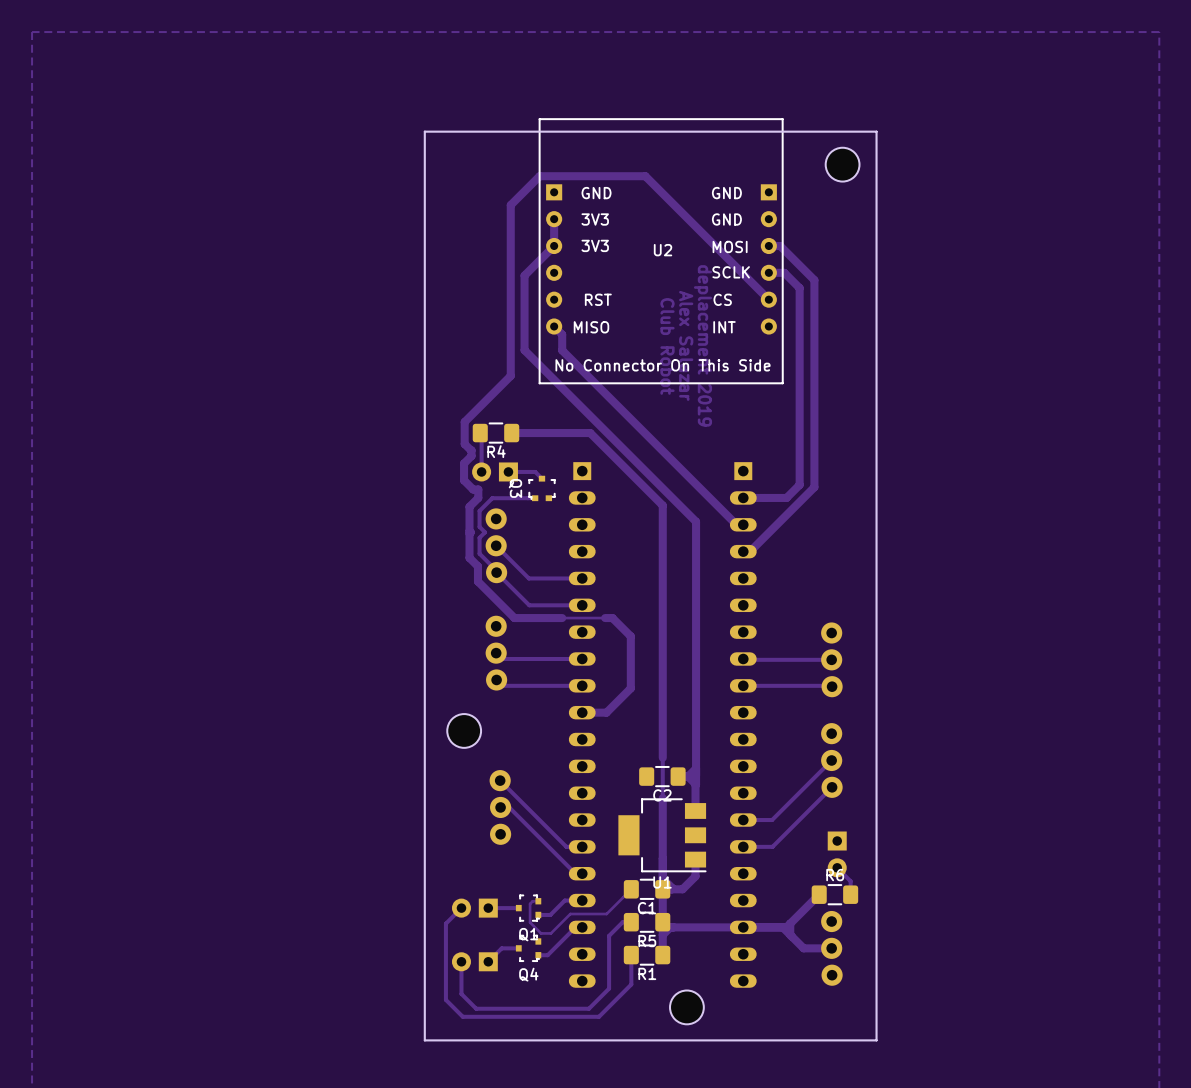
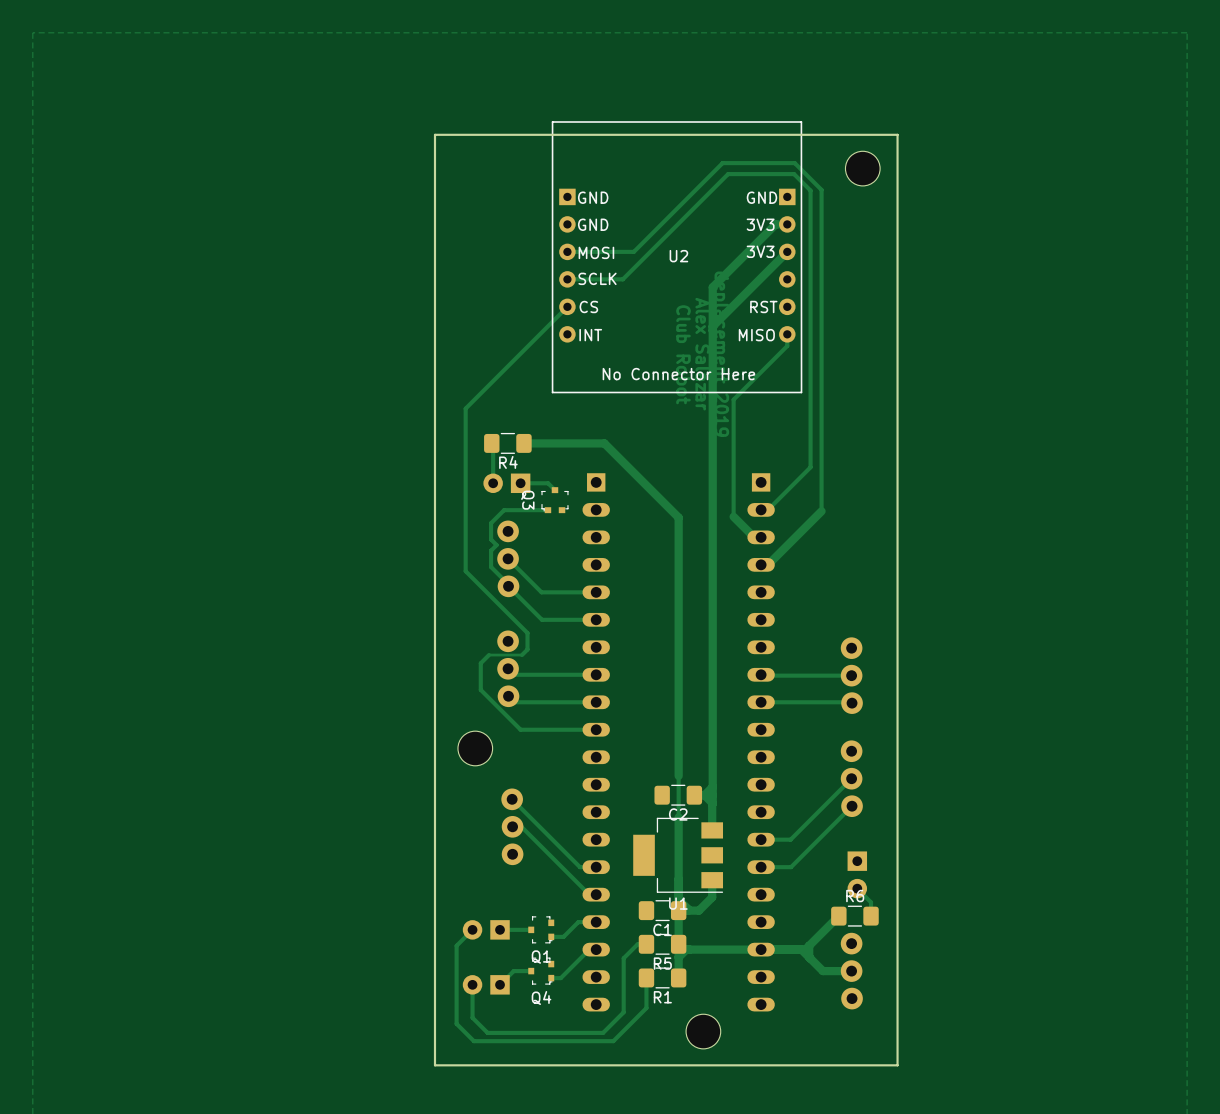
track: (554, 219) (554, 245) (524, 275) (524, 350) (696, 521) -> (787, 224) (775, 224) (712, 287) (712, 534)
track: none -> (567, 251) (633, 251) (722, 163) (794, 163) (821, 189) (821, 511)
track: (768, 245) (780, 245) (814, 280) (814, 487) (802, 499) -> (787, 251) (712, 326)
U2 side: top (661, 251) -> bottom (677, 257)
track: none -> (567, 279) (622, 279) (728, 174) (794, 174) (810, 190) (810, 467) (767, 509)
track: (768, 272) (784, 272) (799, 288) (799, 484) (786, 497) (743, 497) -> none
track: (768, 299) (645, 176) (539, 176) (510, 205) (510, 375) (464, 422) (464, 444) (471, 450) (471, 456) (464, 463) (464, 480) (473, 489) (478, 489) (478, 497) (469, 506) (469, 557) (477, 566) (477, 581) (514, 618) (612, 618) (630, 636) (630, 688) (606, 712) (582, 712) -> (567, 306) (465, 408) (465, 571) (527, 633) (527, 649) (522, 655) (489, 655) (480, 663) (480, 689) (520, 729) (596, 729)
track: (554, 326) (562, 334) (562, 350) (716, 504) -> (787, 334) (787, 346) (733, 399) (733, 516)
track: (631, 889) (606, 914) (570, 914) (550, 933) (541, 933) (530, 922) (530, 903) (532, 901) (538, 901) -> none

